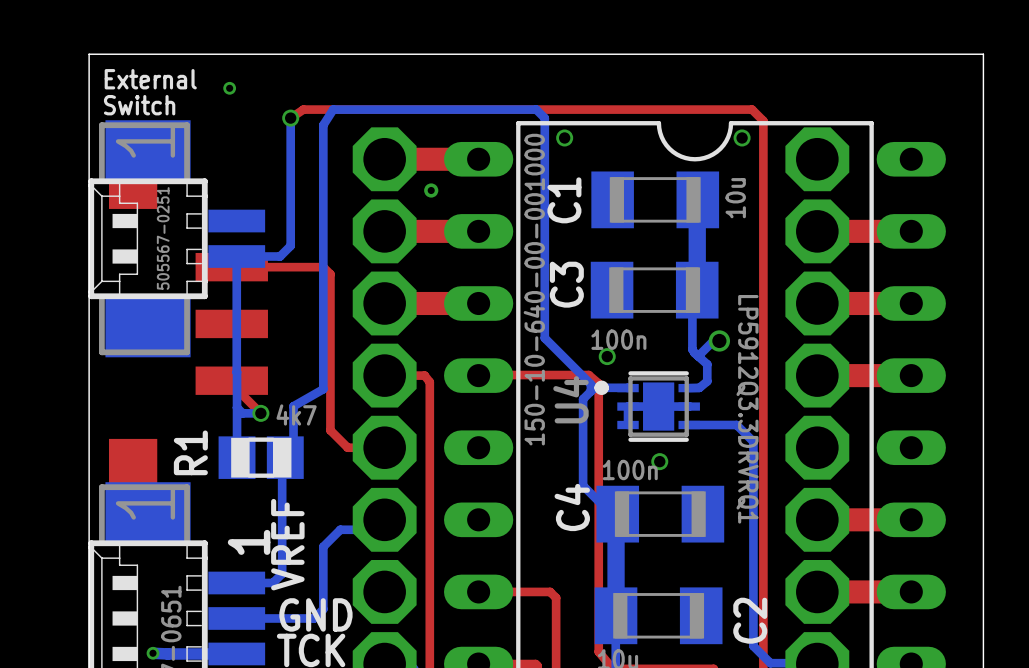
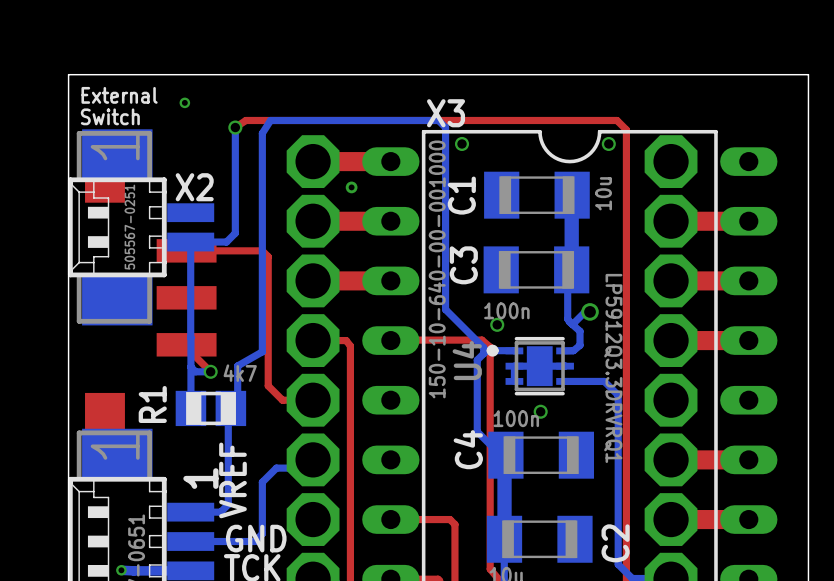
text: none -> X3 (446, 113)
text: none -> X2 (194, 187)

